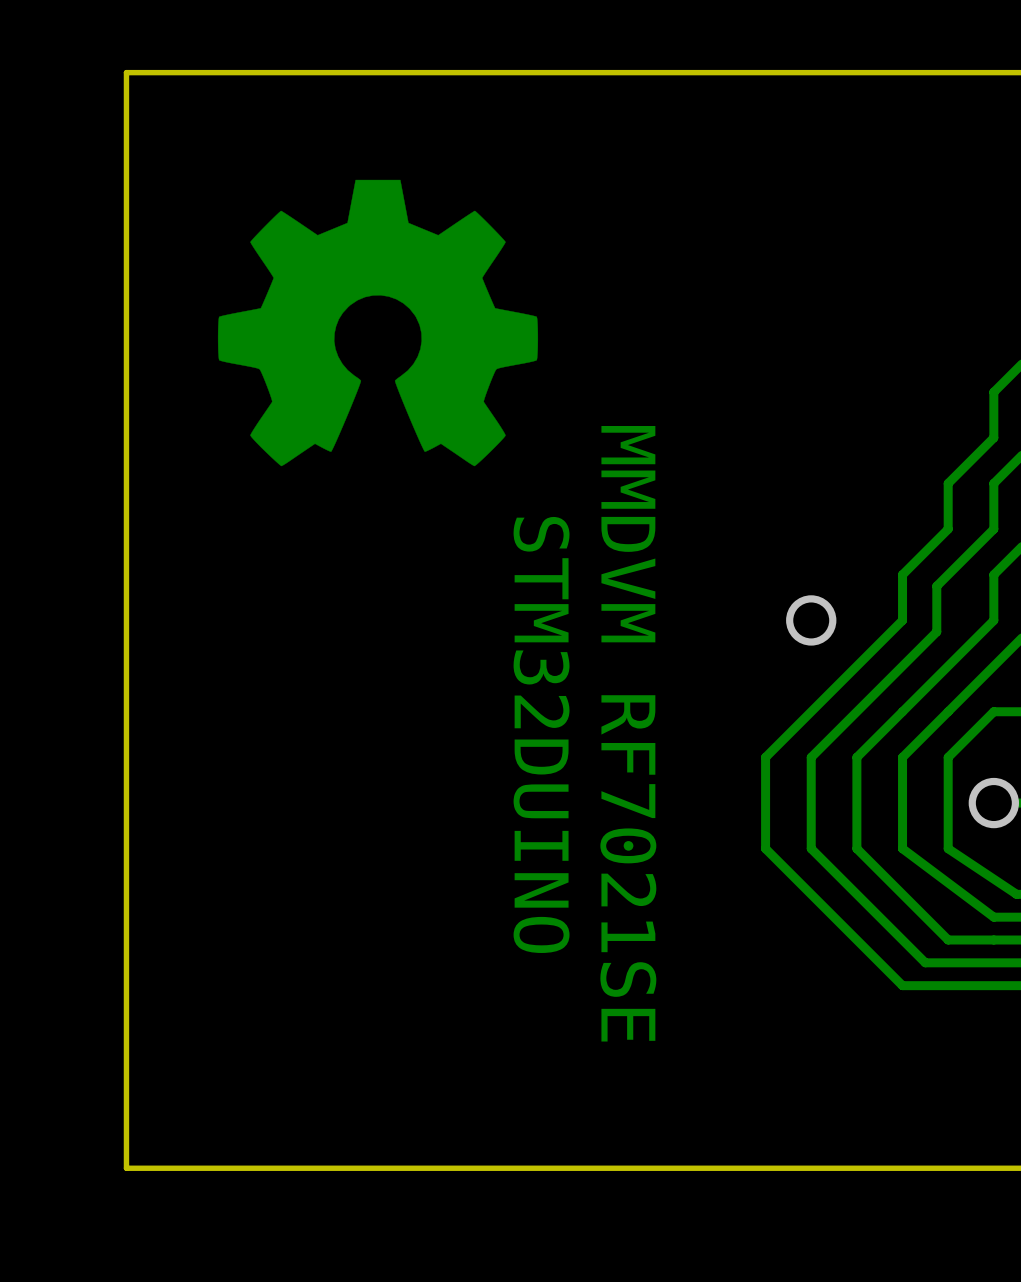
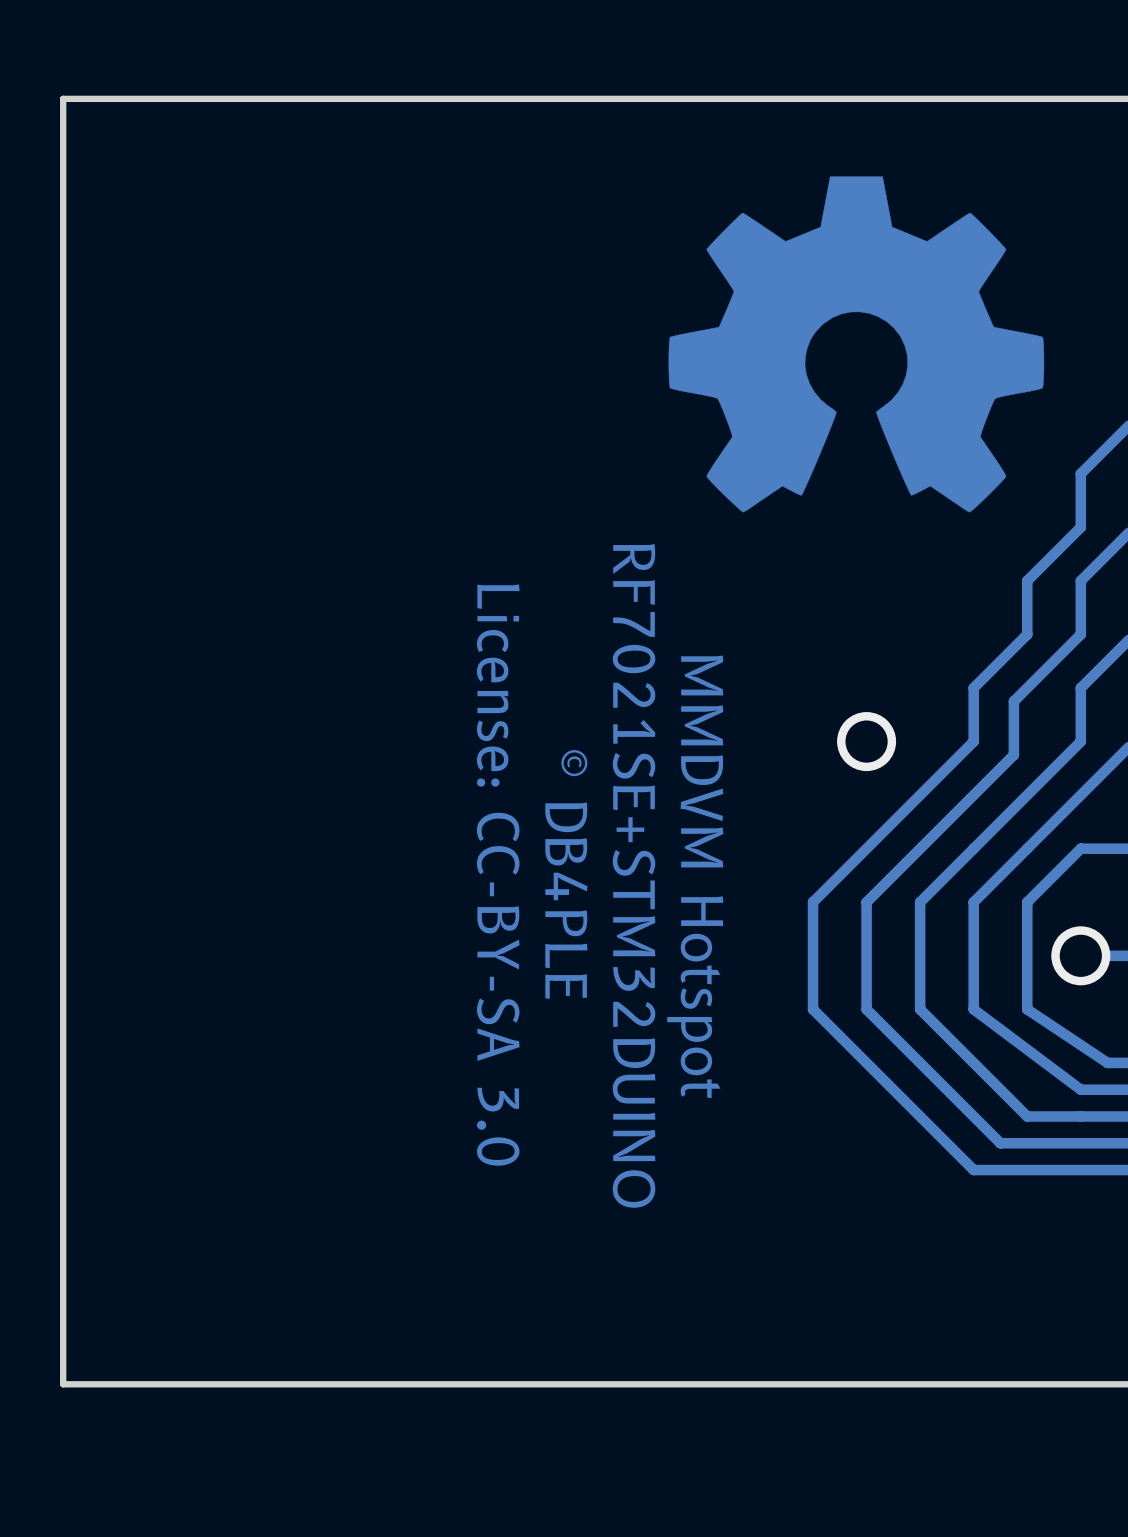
drawing position: (377, 323) -> (856, 344)
text: MMDVM RF7021SE (628, 733) -> RF7021SE+STM32DUINO (634, 875)
text: none -> MMDVM Hotspot (695, 876)
text: STM32DUINO (541, 734) -> © DB4PLE (566, 874)
text: none -> License: CC-BY-SA 3.0 (498, 875)

